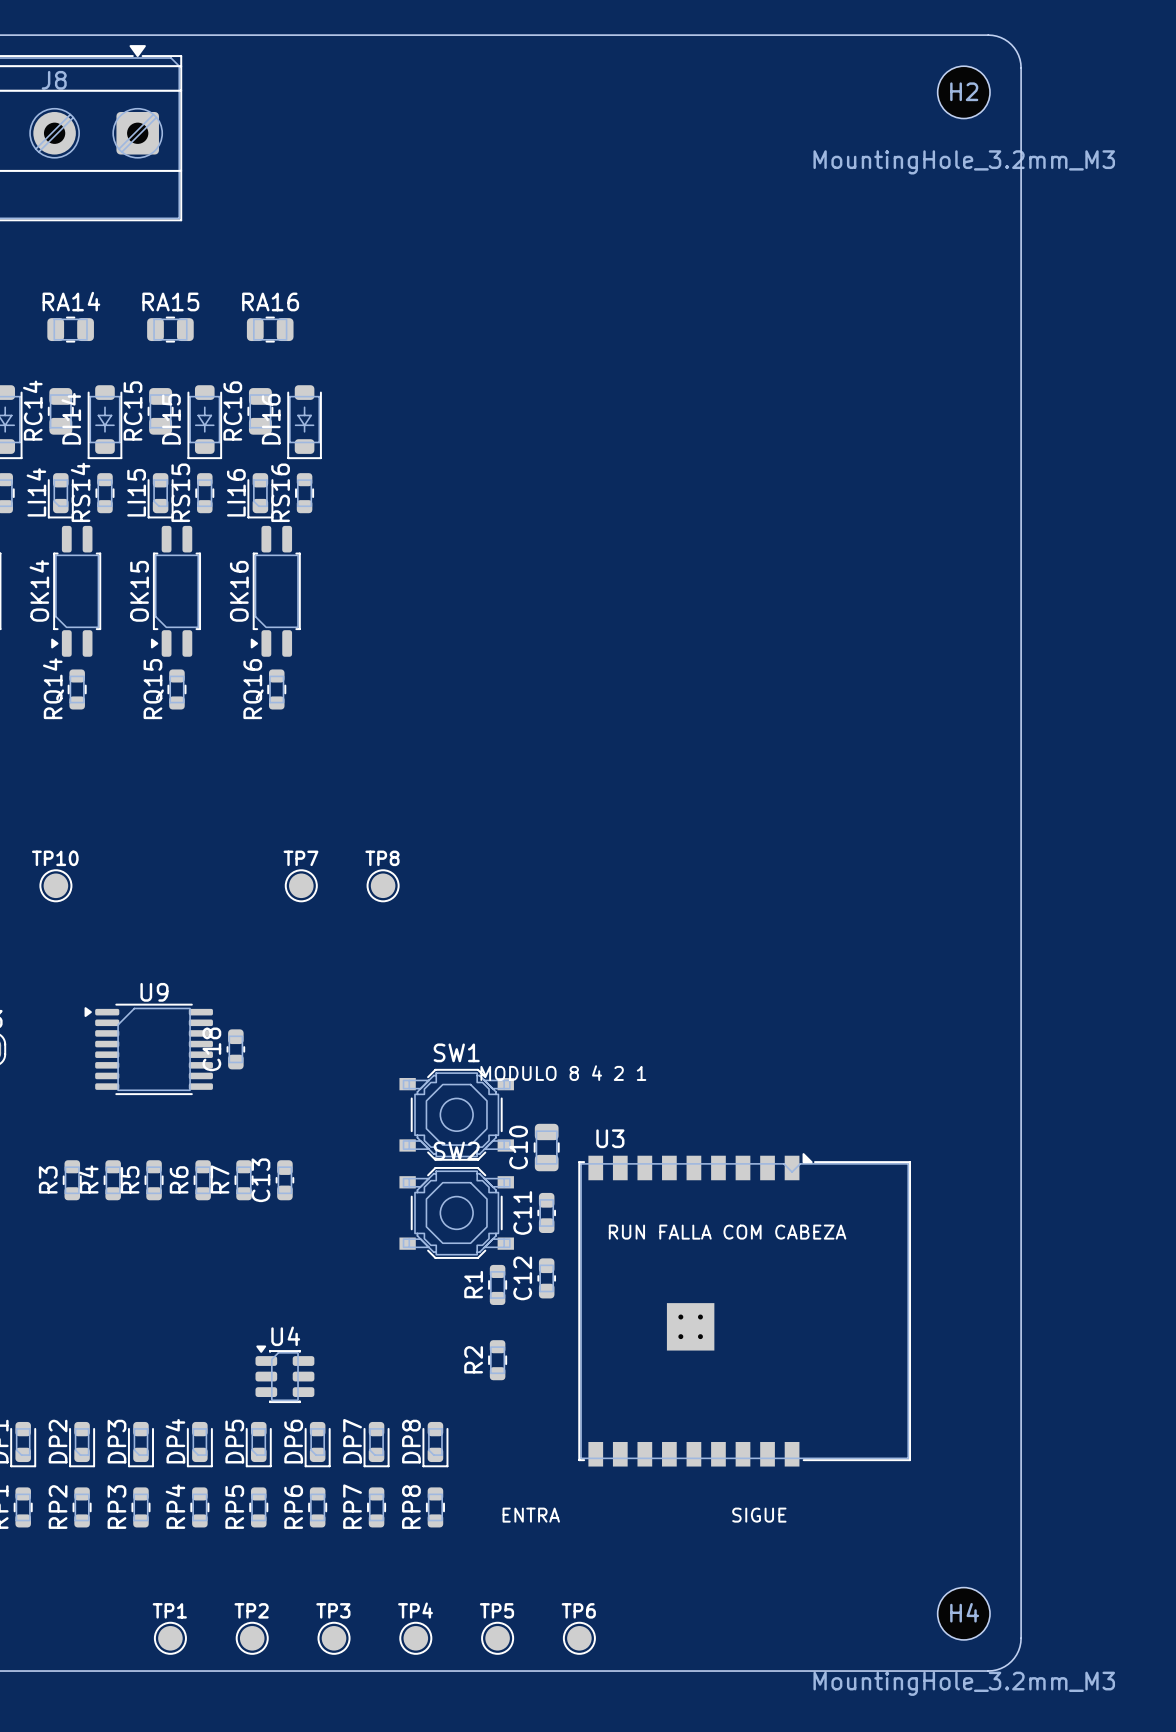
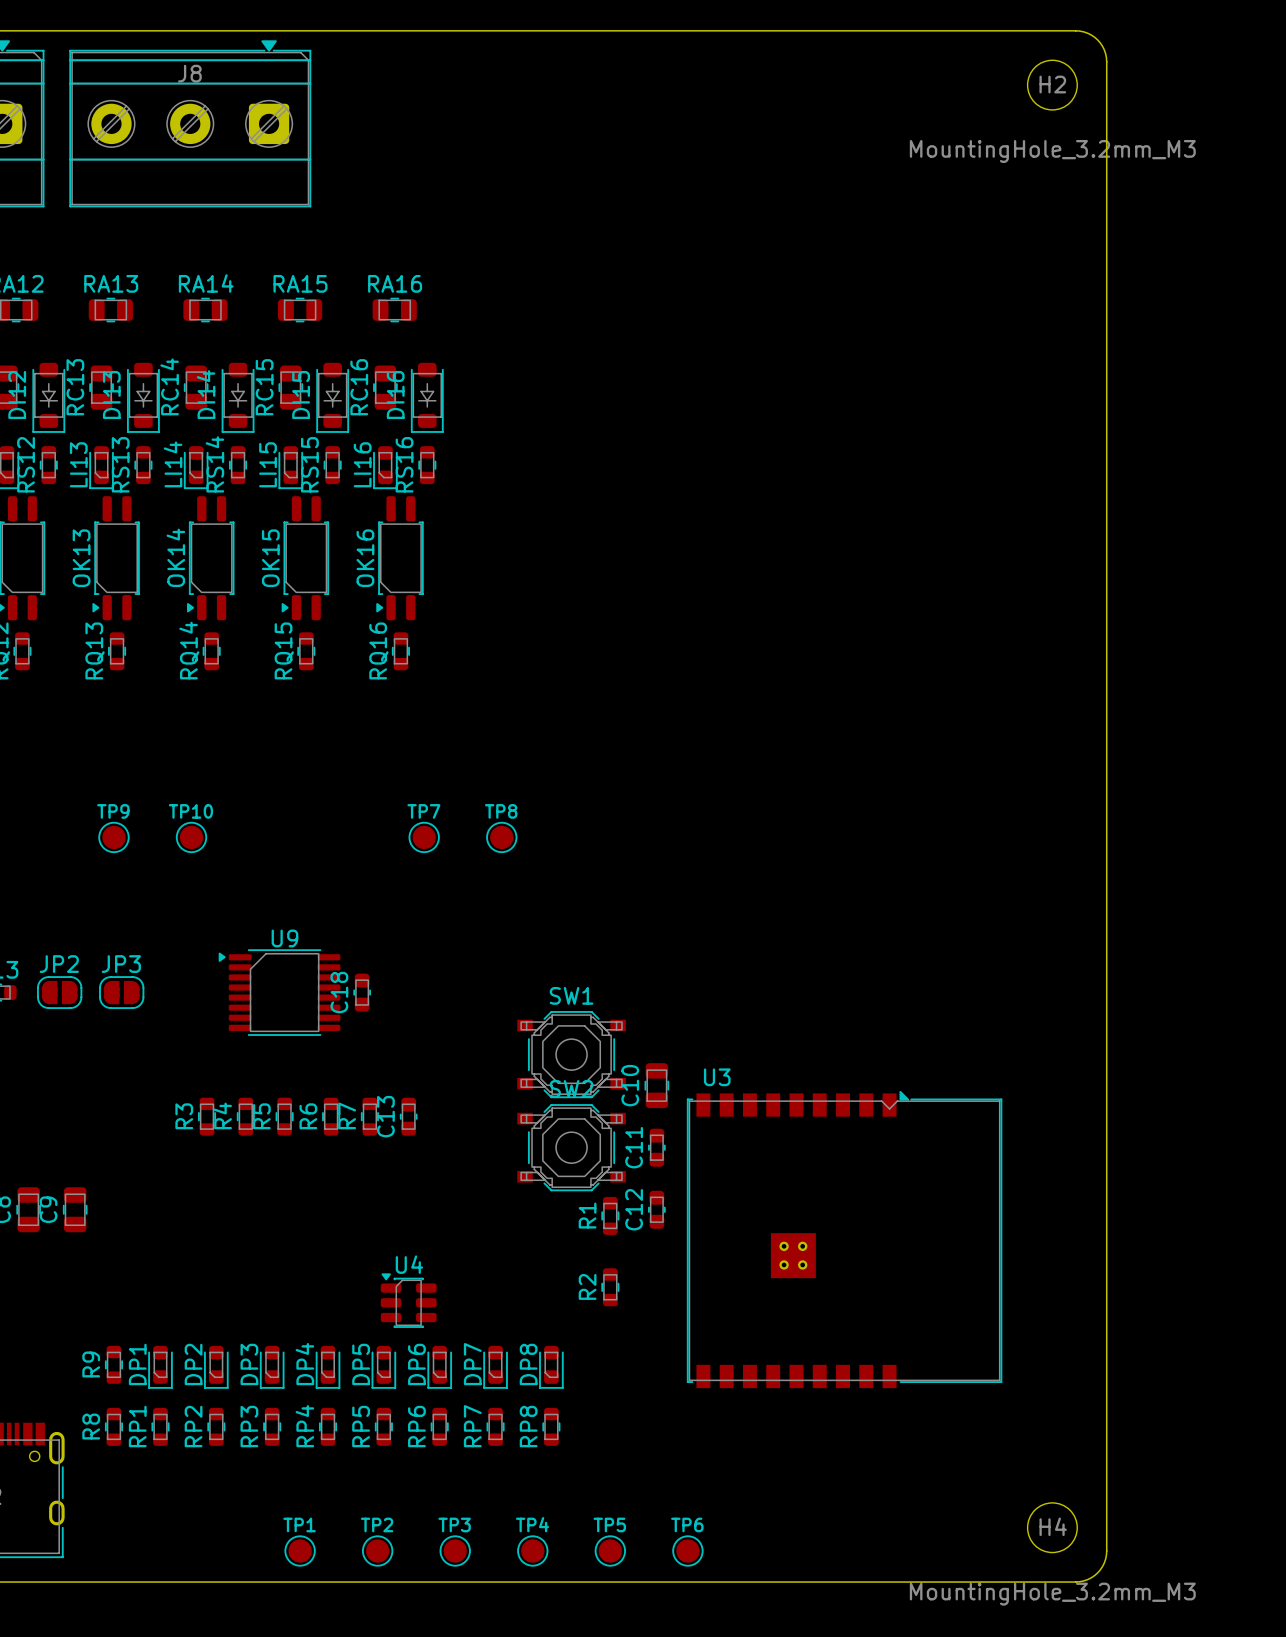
text: MODULO 8 4 2 1 (563, 1073) -> none
text: RUN FALLA COM CABEZA (727, 1232) -> none
text: ENTRA (531, 1515) -> none
text: SIGUE (759, 1515) -> none

